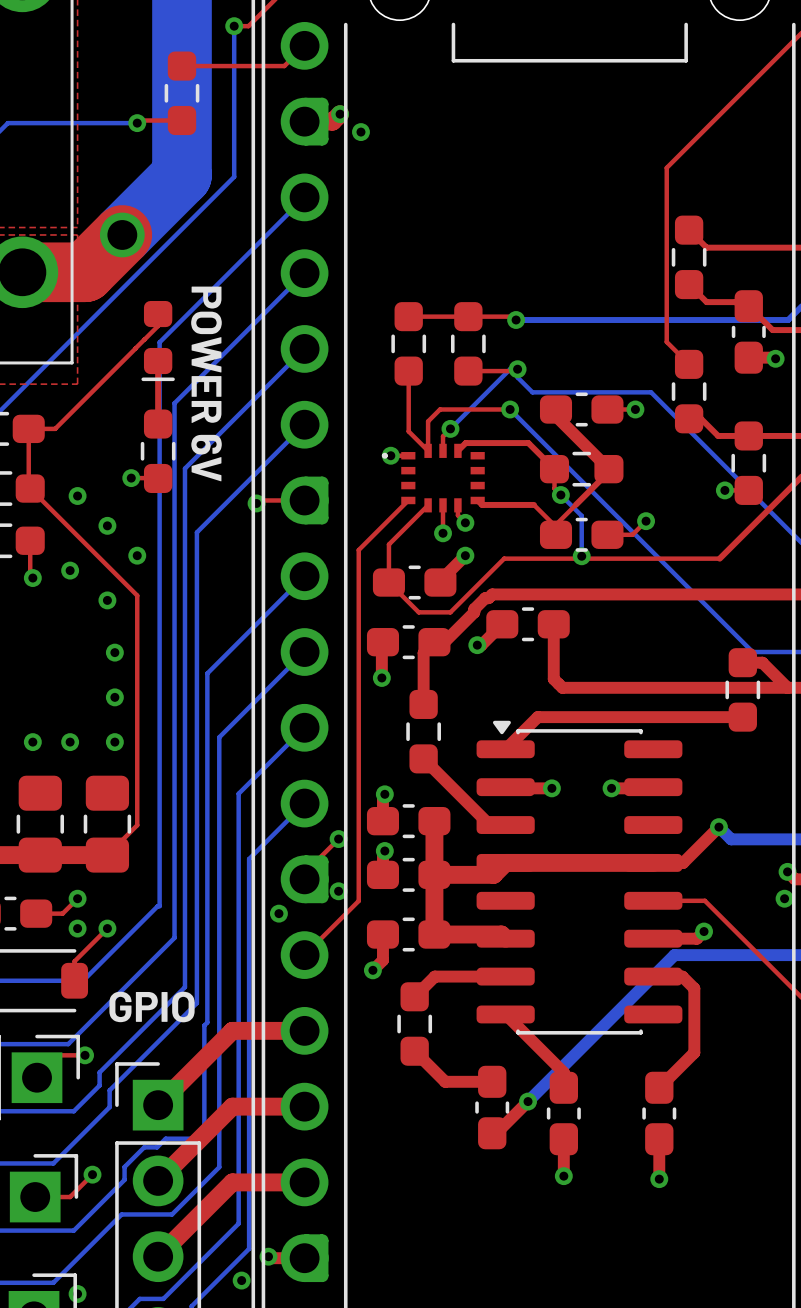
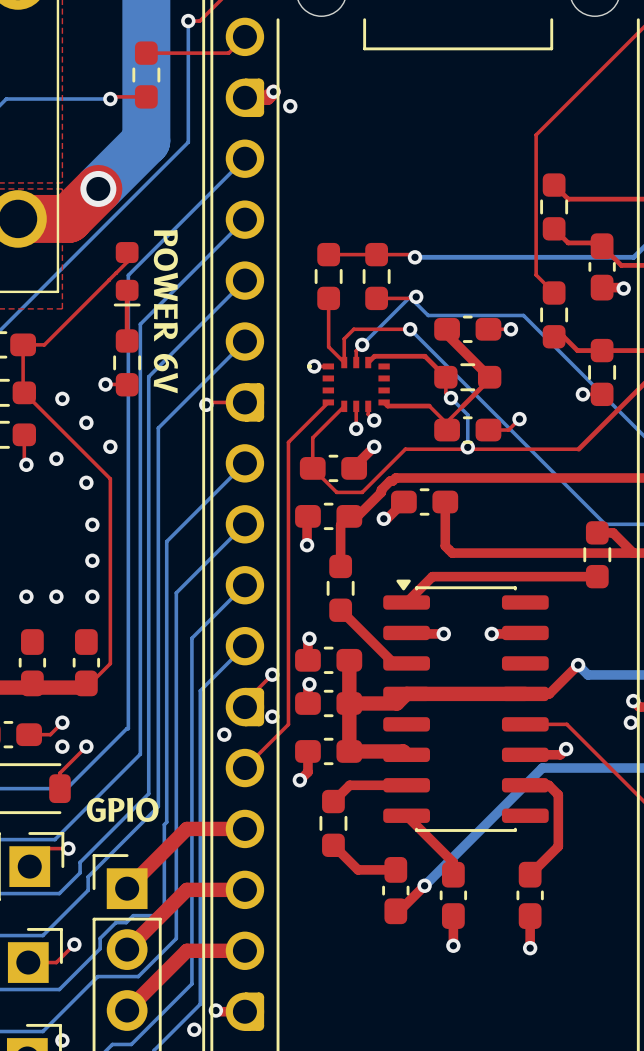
part footprint: [16, 775, 65, 873] -> [18, 629, 47, 697]
part footprint: [83, 775, 132, 873] -> [72, 629, 101, 697]

